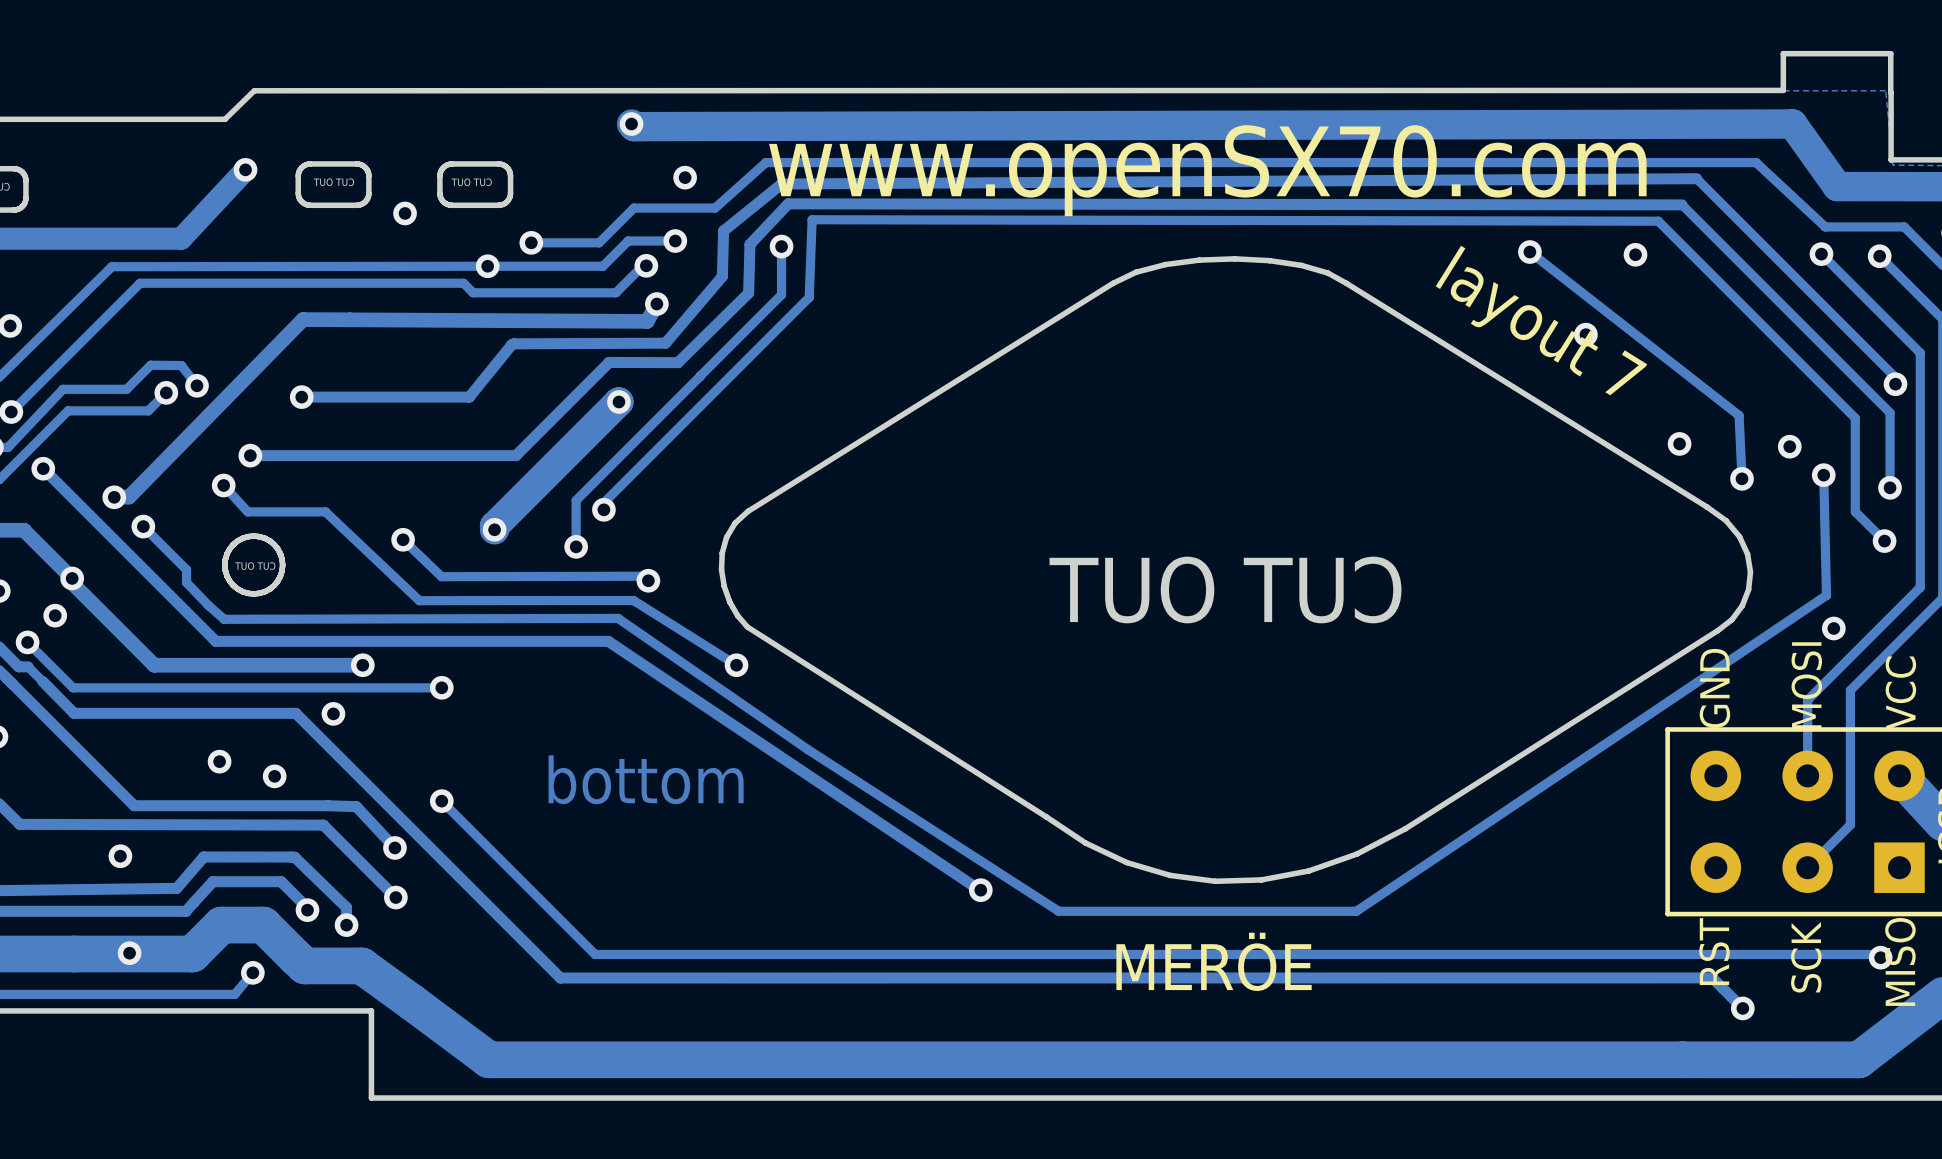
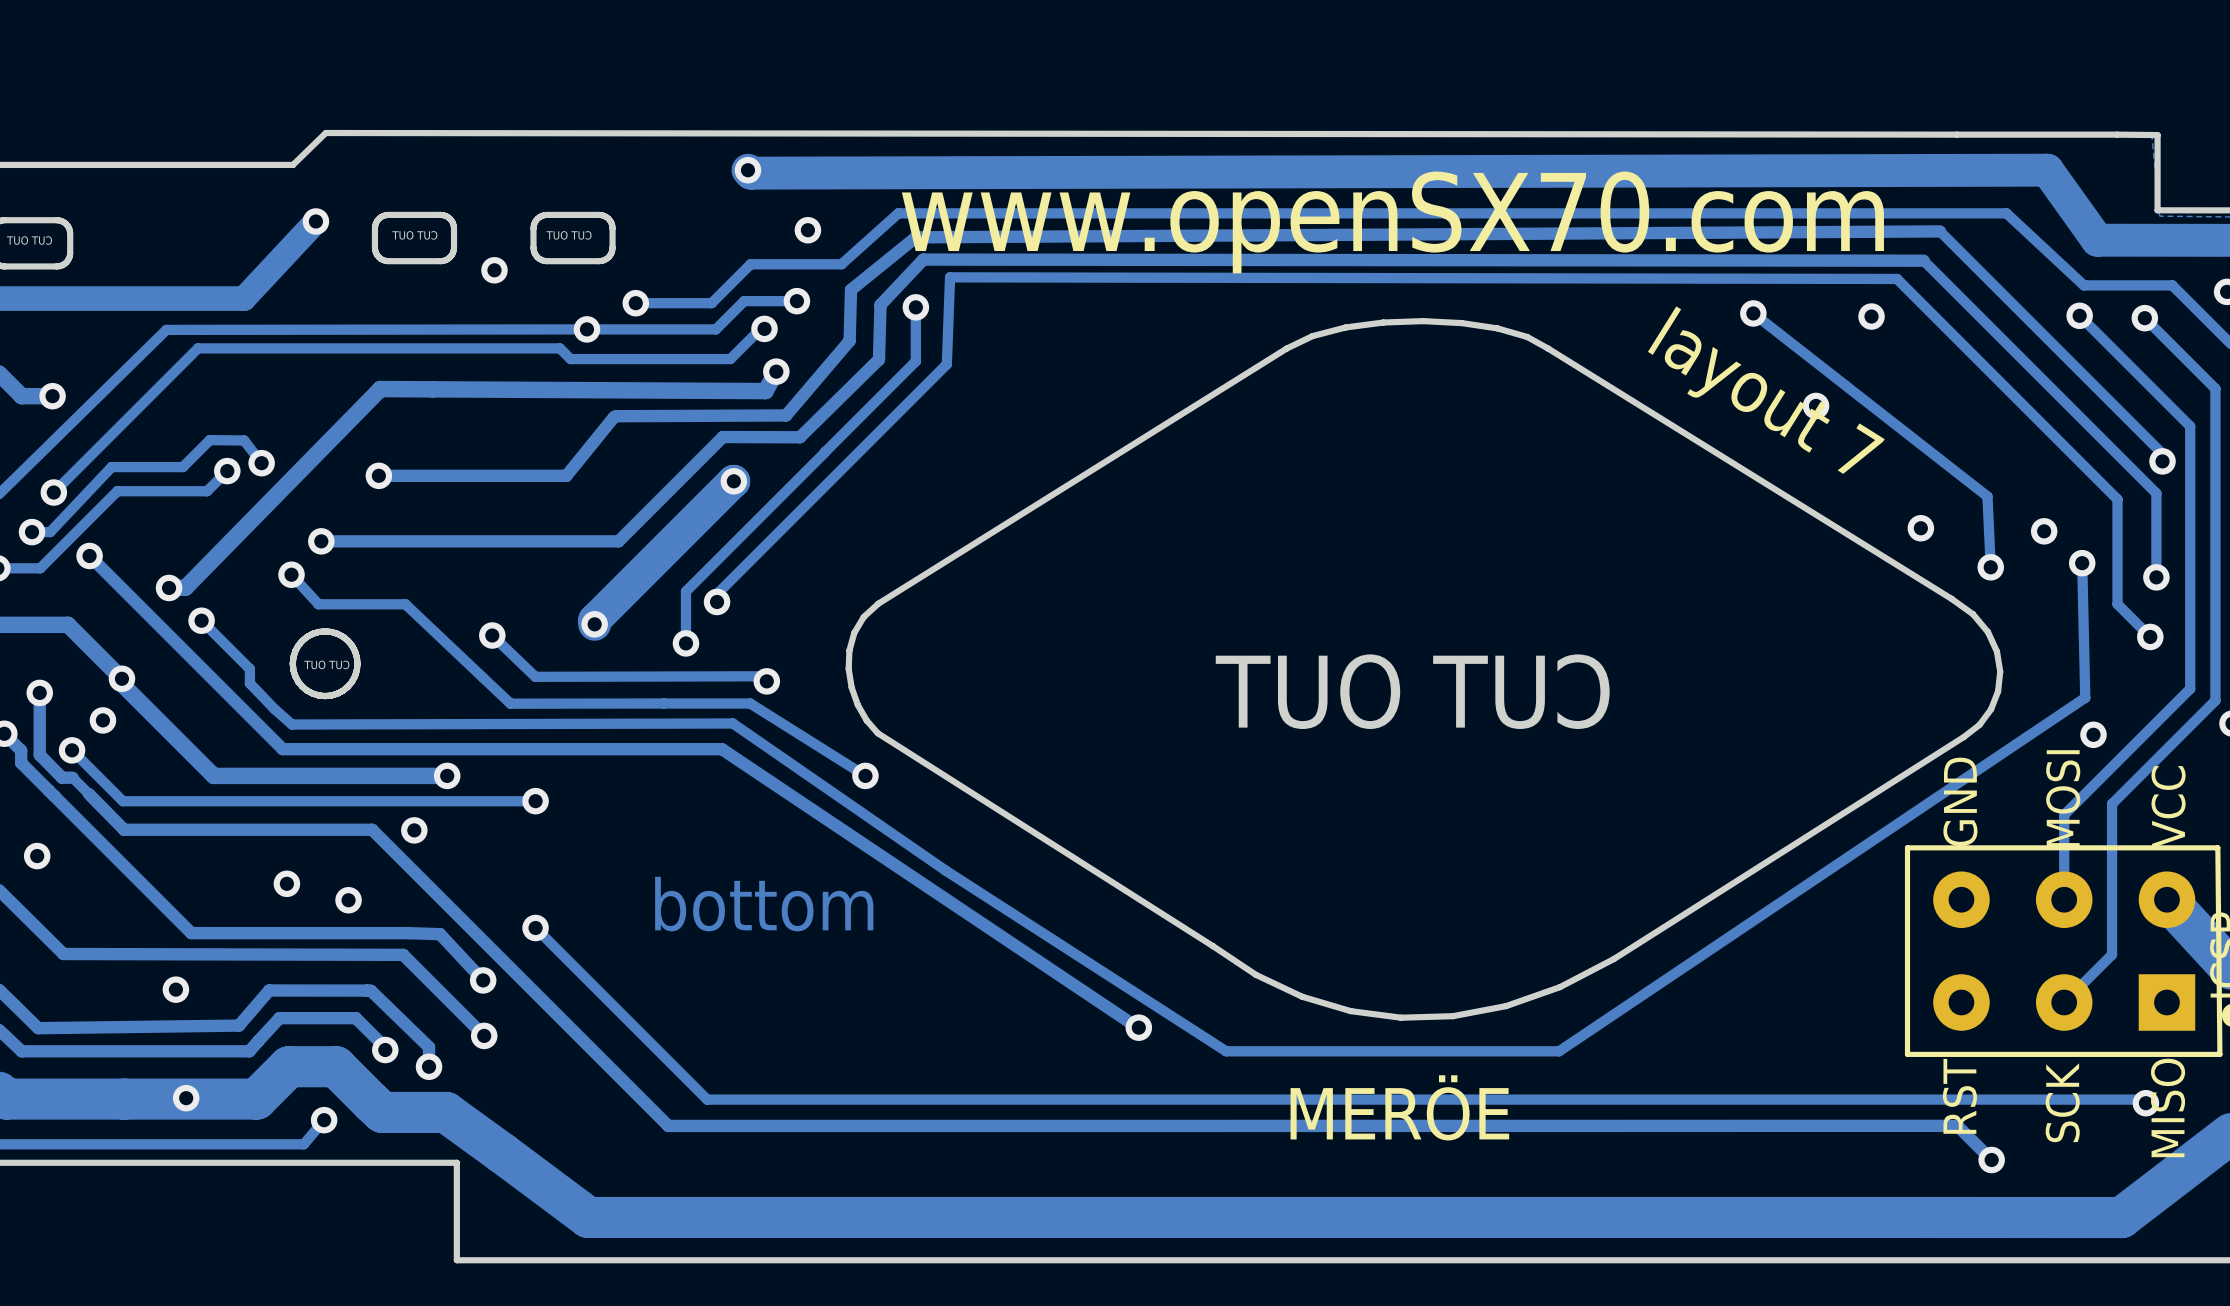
board edge: (254, 90) (1783, 90) (1783, 53) (1890, 53) (1890, 92) -> (325, 133) (2157, 135)

